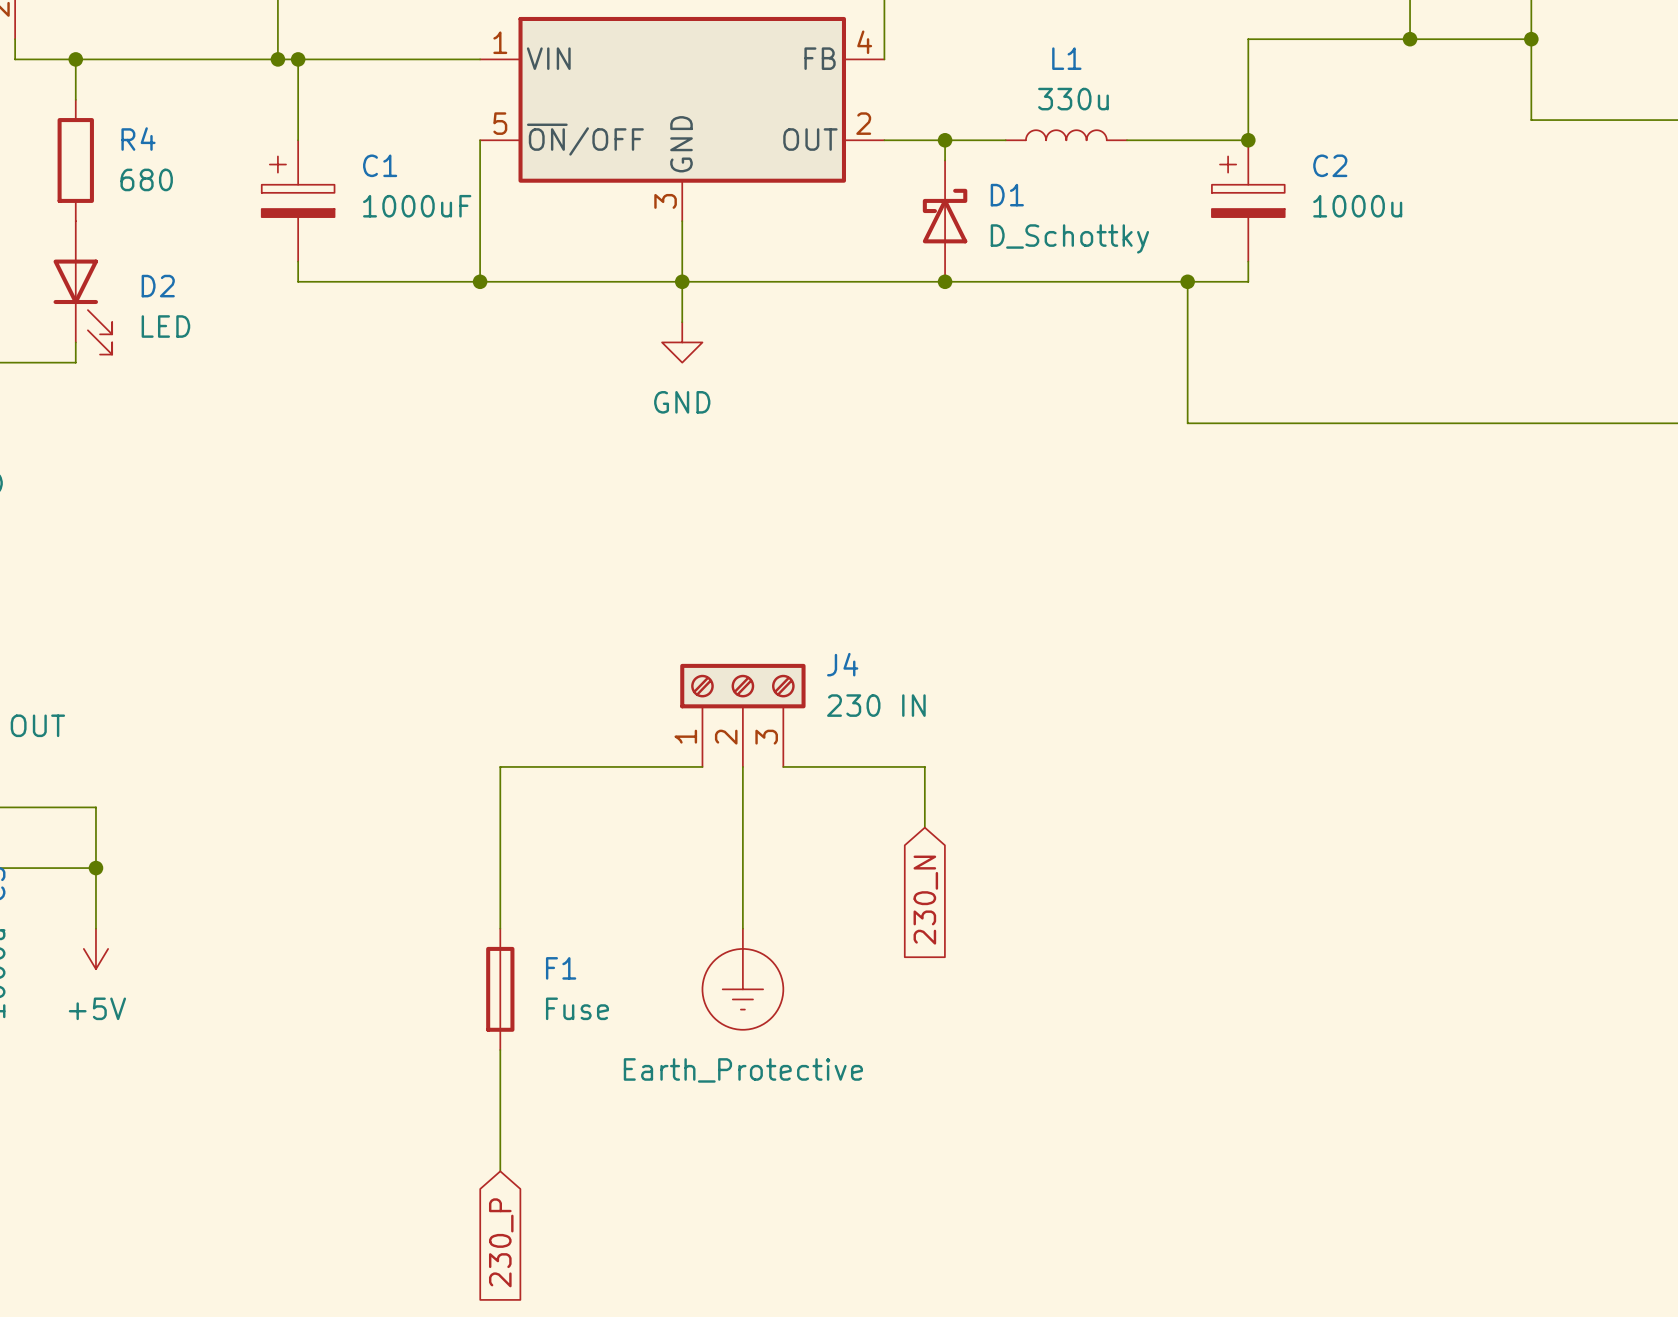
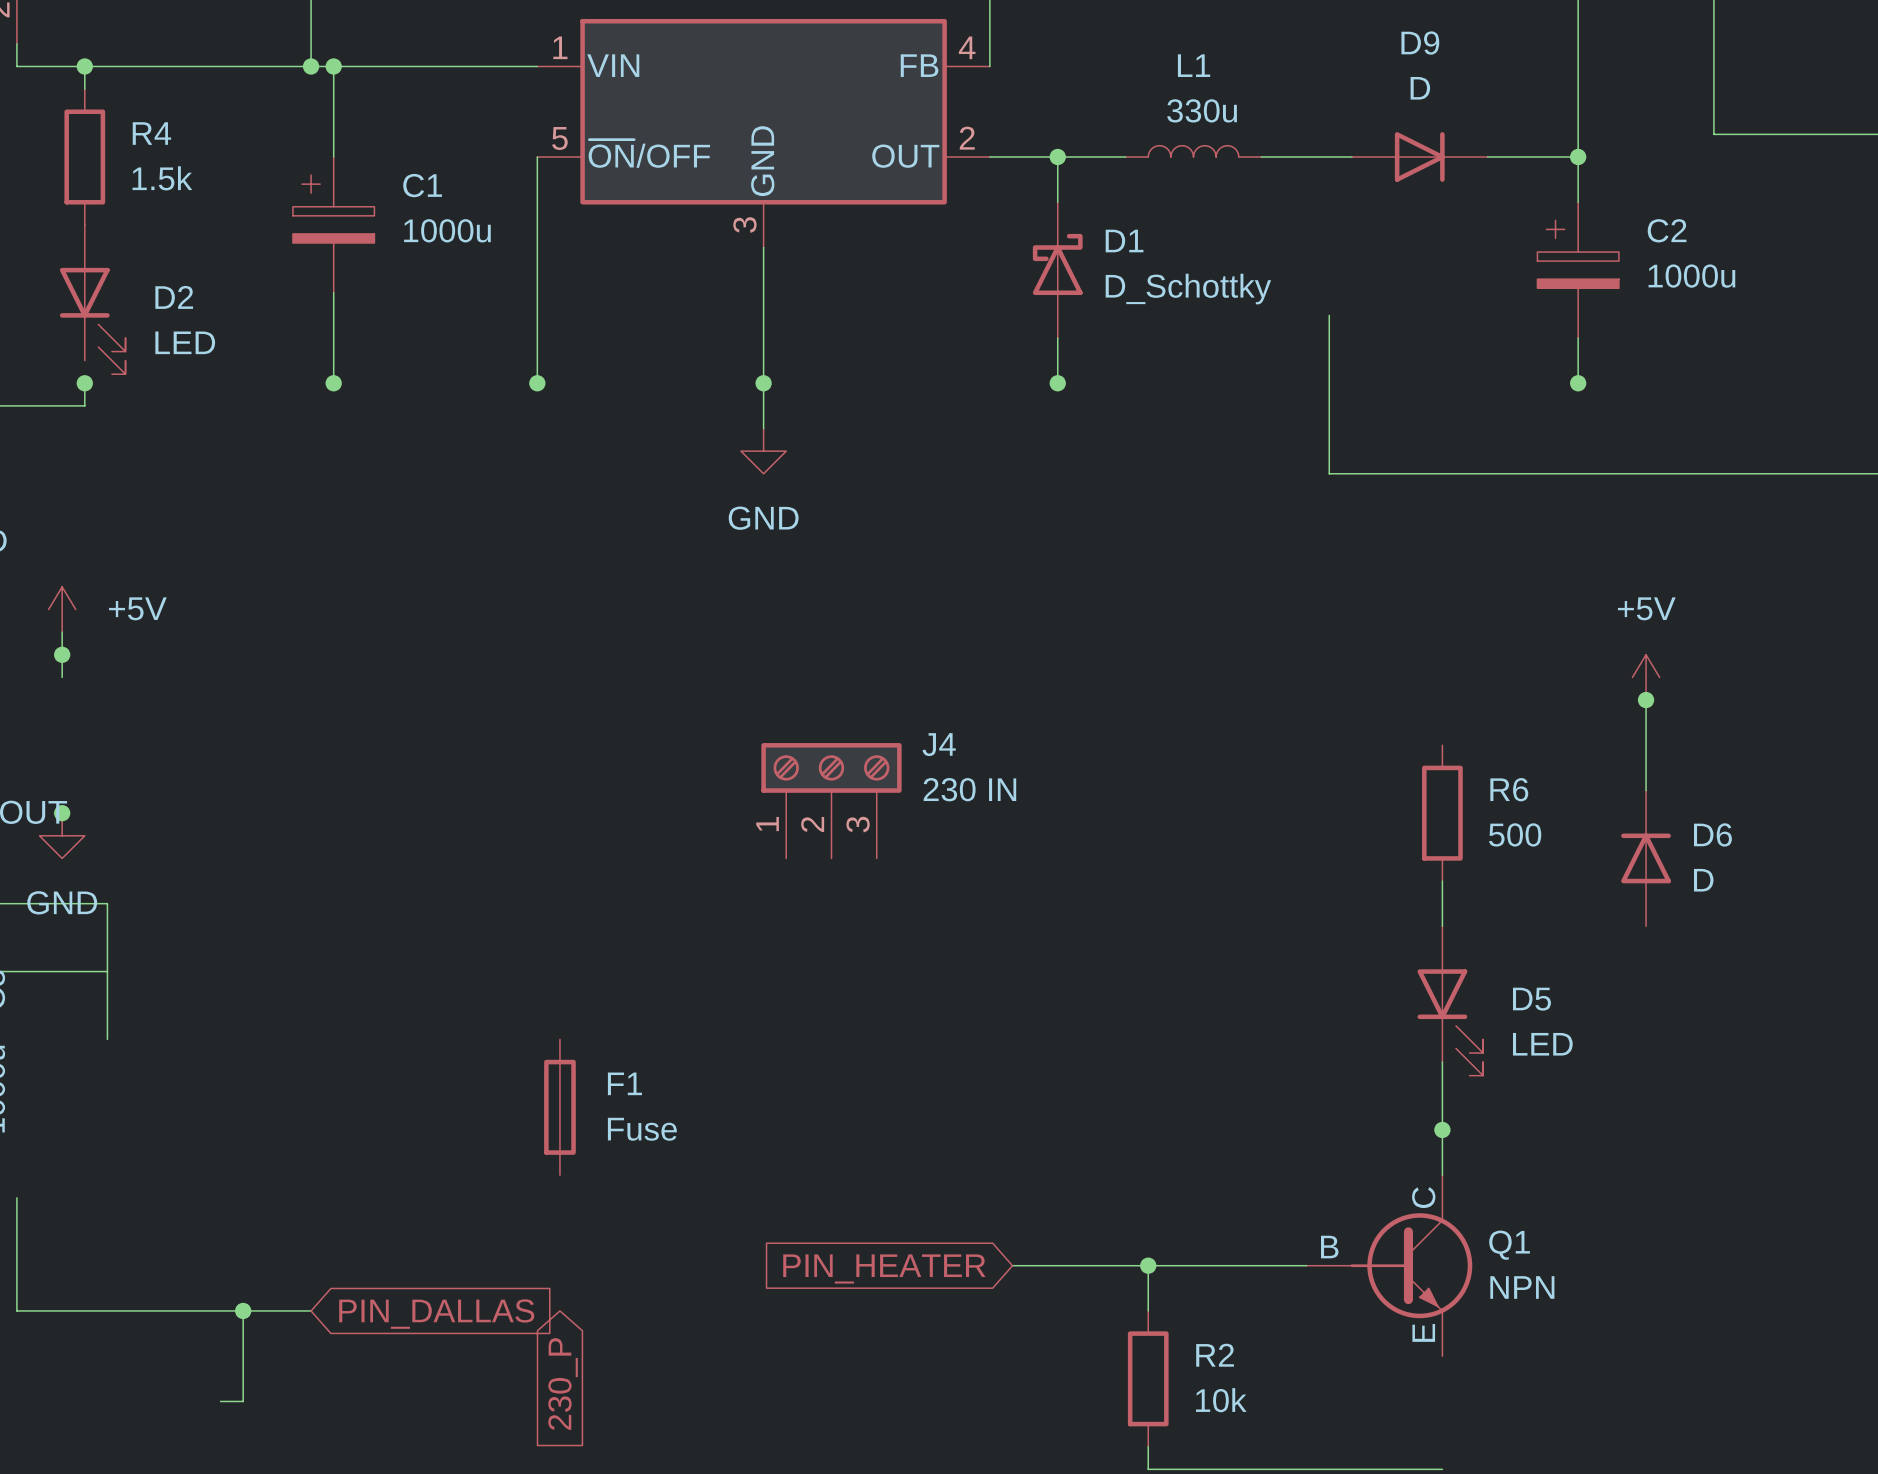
wire: none -> (1578, 43) (1578, 202)
junction: (1410, 39) -> none
wire: (1531, 39) (1248, 39) (1248, 140) (1207, 140) -> none
junction: (1531, 39) -> none
junction: (1248, 140) -> none
D9: none -> D (1419, 157)
wire: none -> (1487, 157) (1578, 157)
junction: none -> (1578, 157)
R4 position: (75, 160) -> (84, 157)
R4 value: 680 (146, 179) -> 1.5k (162, 178)
C2 position: (1248, 200) -> (1578, 270)
C1 value: 1000uF (417, 206) -> 1000u (447, 230)
D1 position: (945, 221) -> (1057, 270)
wire: (1248, 261) (1248, 281) (298, 281) -> (333, 383) (333, 315)
wire: none -> (537, 315) (537, 383)
junction position: (480, 281) -> (537, 383)
junction position: (682, 281) -> (763, 383)
junction position: (945, 281) -> (1057, 383)
junction: (1187, 281) -> none
D2 position: (82, 287) -> (92, 299)
wire: none -> (1057, 338) (1057, 383)
wire: none -> (1578, 338) (1578, 383)
wire: none -> (763, 360) (763, 428)
junction: none -> (84, 383)
junction: none -> (333, 383)
power symbol position: GND (682, 342) -> GND (763, 451)
junction: none -> (1578, 383)
power symbol: none -> +5V (62, 609)
wire: none -> (62, 632) (62, 677)
junction: none -> (62, 654)
power symbol: none -> +5V (1646, 677)
wire: none -> (1646, 700) (1646, 790)
junction: none -> (1646, 700)
junction: none -> (62, 813)
R6: none -> 500 (1442, 813)
power symbol: none -> GND (62, 835)
wire: (702, 766) (500, 766) (500, 928) -> none
wire: (742, 766) (742, 928) -> none
wire: (783, 766) (924, 766) (924, 827) -> none
D6: none -> D (1646, 858)
wire: none -> (1442, 881) (1442, 926)
junction: (95, 868) -> none
D5: none -> LED (1450, 1000)
global label: 230_N (925, 900) -> none
power symbol: +5V (95, 948) -> none
wire: none -> (1442, 1062) (1442, 1175)
power symbol: Earth_Protective (742, 979) -> none
junction: none -> (1442, 1129)
wire: (500, 1050) (500, 1171) -> none
wire: none -> (16, 1197) (16, 1310) (311, 1310)
wire: none -> (1012, 1265) (1306, 1265)
wire: none -> (1148, 1265) (1148, 1310)
junction: none -> (1148, 1265)
Q1: none -> NPN (1389, 1265)
global label: none -> PIN_HEATER (884, 1268)
wire: none -> (243, 1310) (243, 1401) (220, 1401)
junction: none -> (243, 1310)
global label: none -> PIN_DALLAS (436, 1314)
R2: none -> 10k (1148, 1378)
wire: none -> (1148, 1446) (1148, 1469) (1442, 1469)

